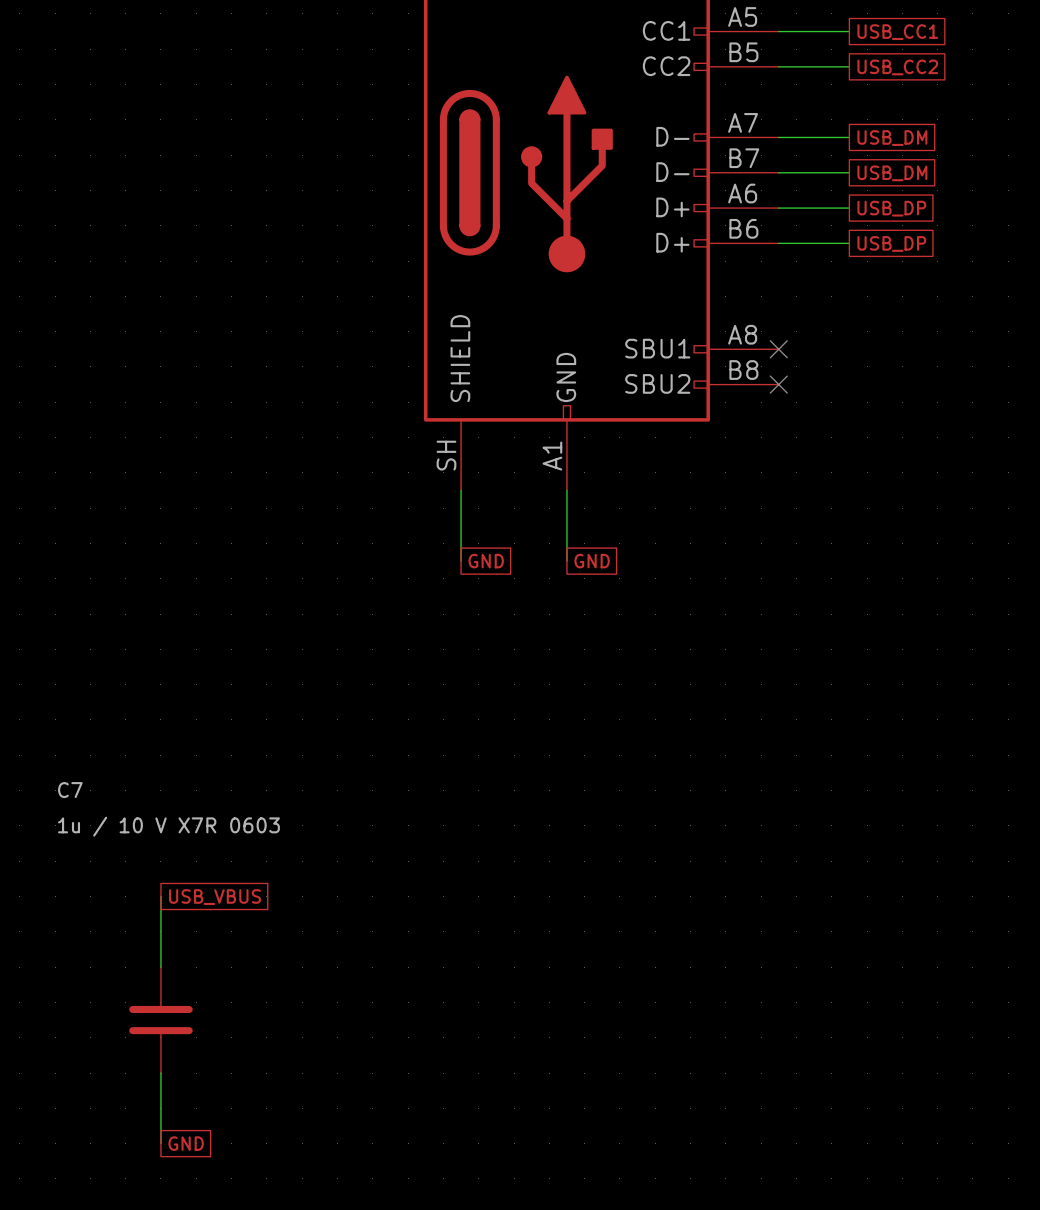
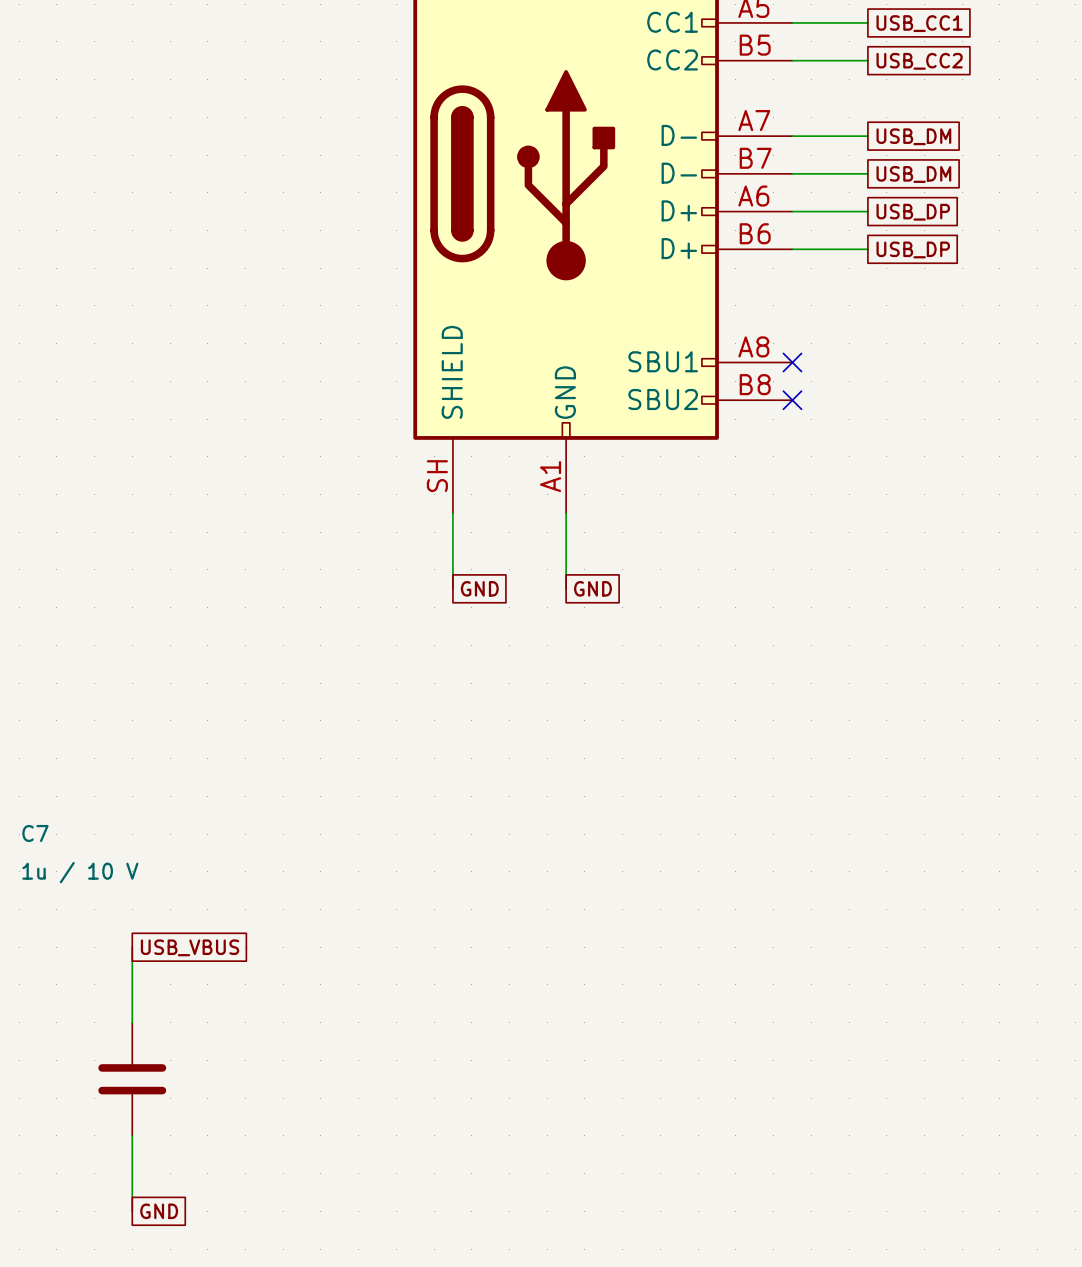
C7 value: 1u / 10 V X7R 0603 (168, 826) -> 1u / 10 V (80, 872)

